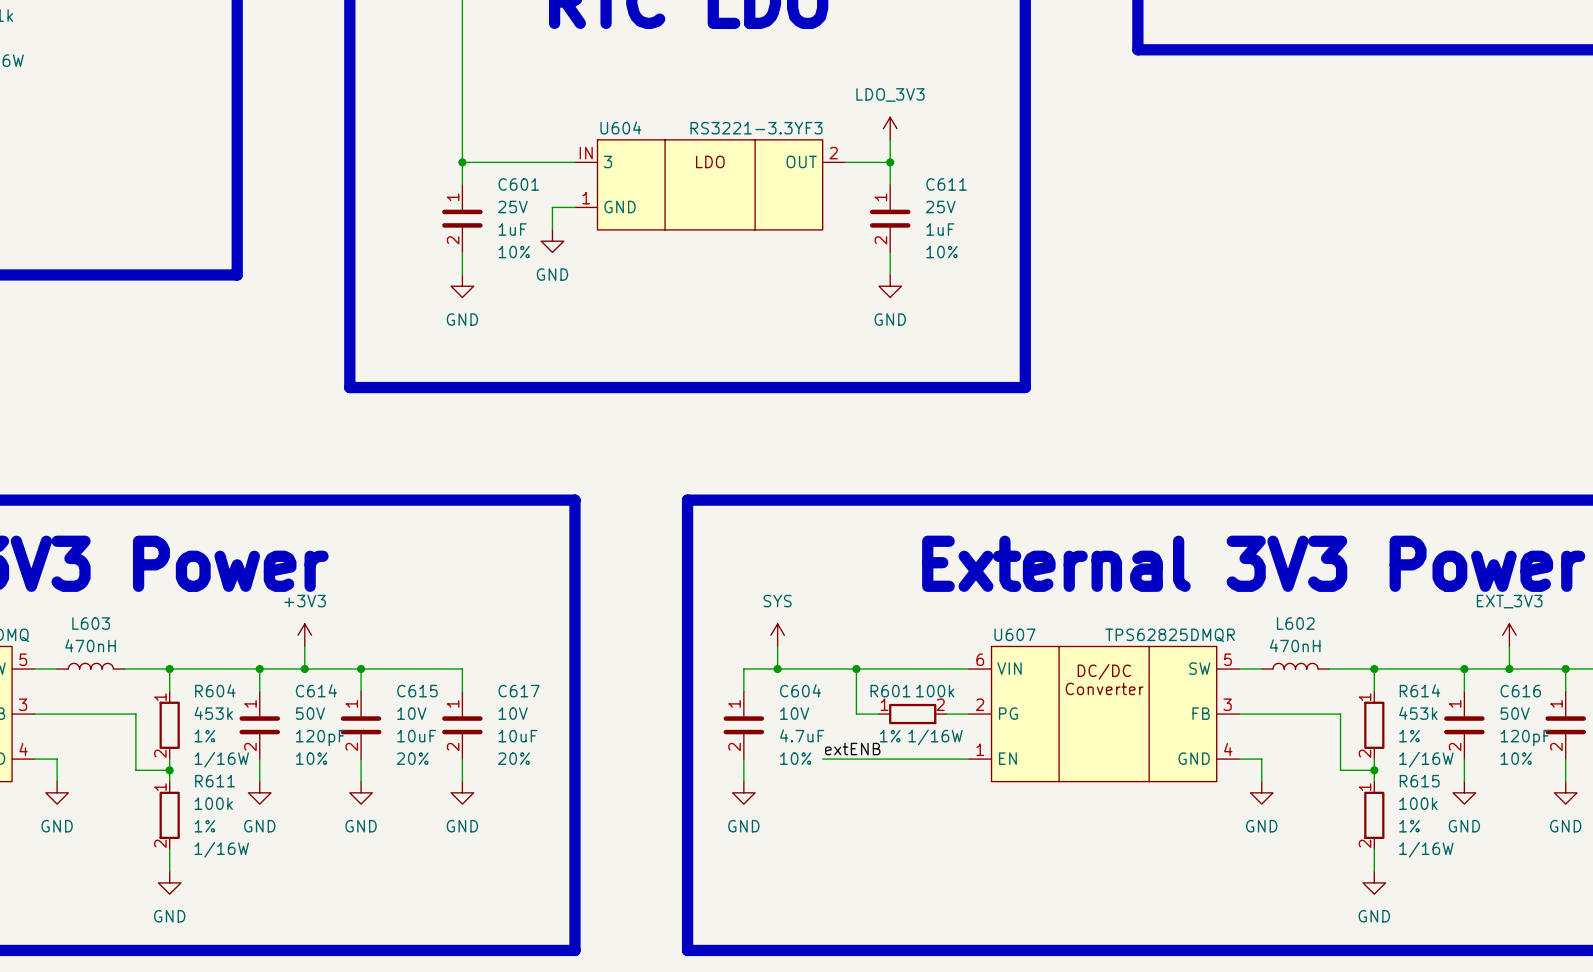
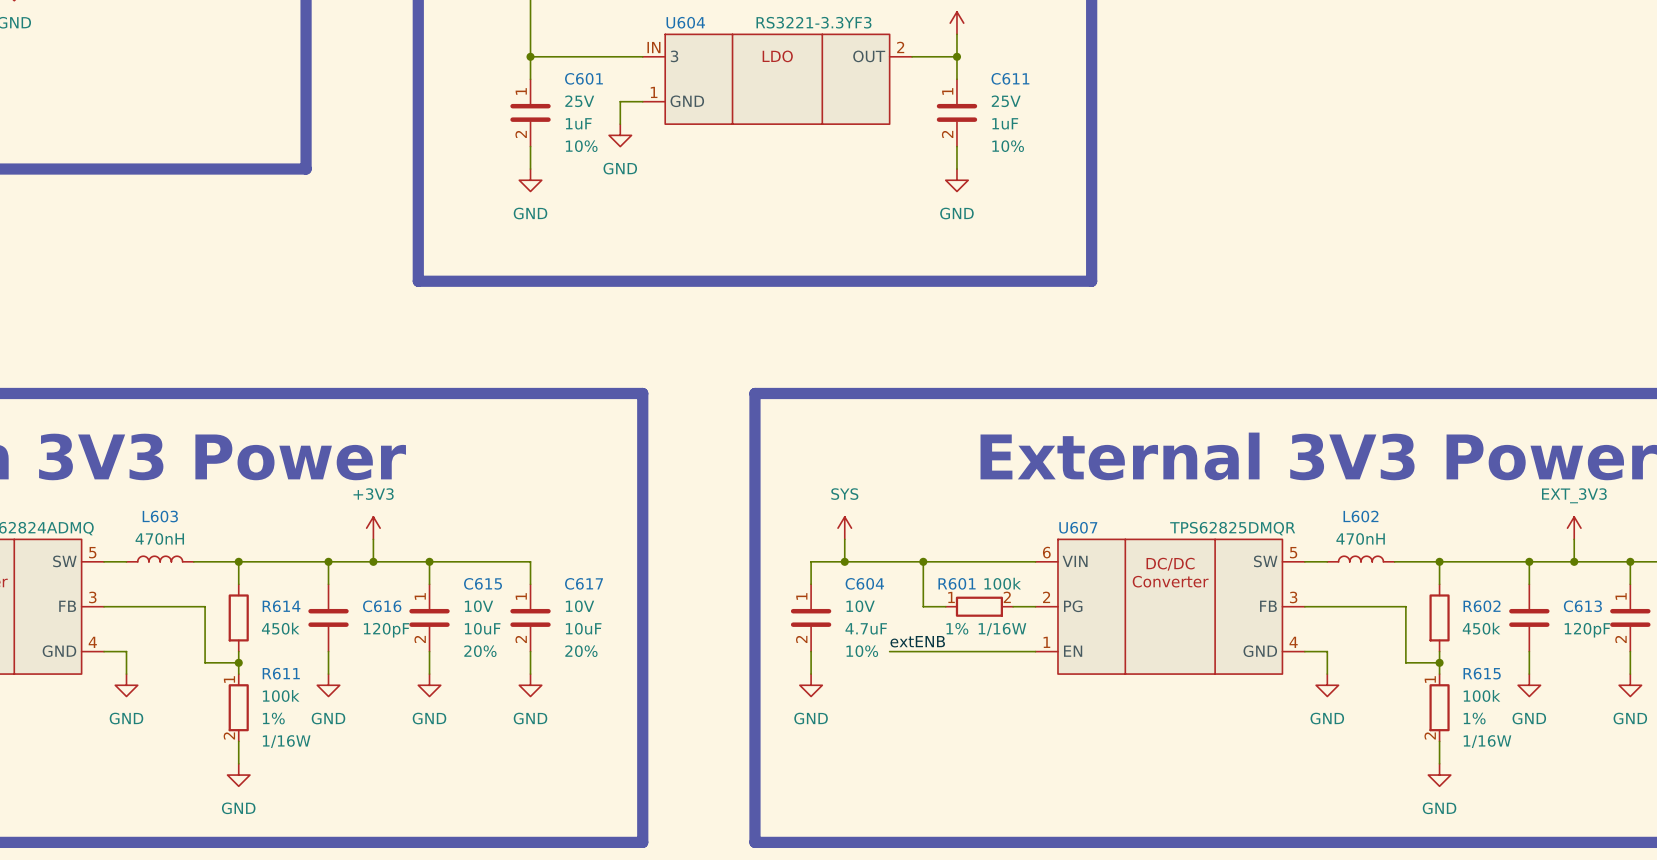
R614 name position: R614 (1419, 690) -> R614 (281, 606)
C616 name position: C616 (1520, 691) -> C616 (382, 606)
R614 pin number: 1 (1365, 697) -> none
C616 pin number: 1 (1455, 703) -> none
R614 text: 453k (1418, 713) -> none
C616 text: 50V (1515, 713) -> none
R604: (169, 725) -> none
C614: (259, 725) -> none
R614 position: (1374, 725) -> (238, 617)
R602: none -> 450k (1439, 617)
C616 position: (1464, 725) -> (328, 617)
C613: none -> 120pF (1529, 617)
R614 value: none -> 450k (280, 628)
R614 text: 1% (1409, 736) -> none
C616 pin number: 2 (1455, 746) -> none
R614 pin number: 2 (1365, 753) -> none
C616 text: 10% (1516, 758) -> none
R614 text: 1/16W (1426, 759) -> none

